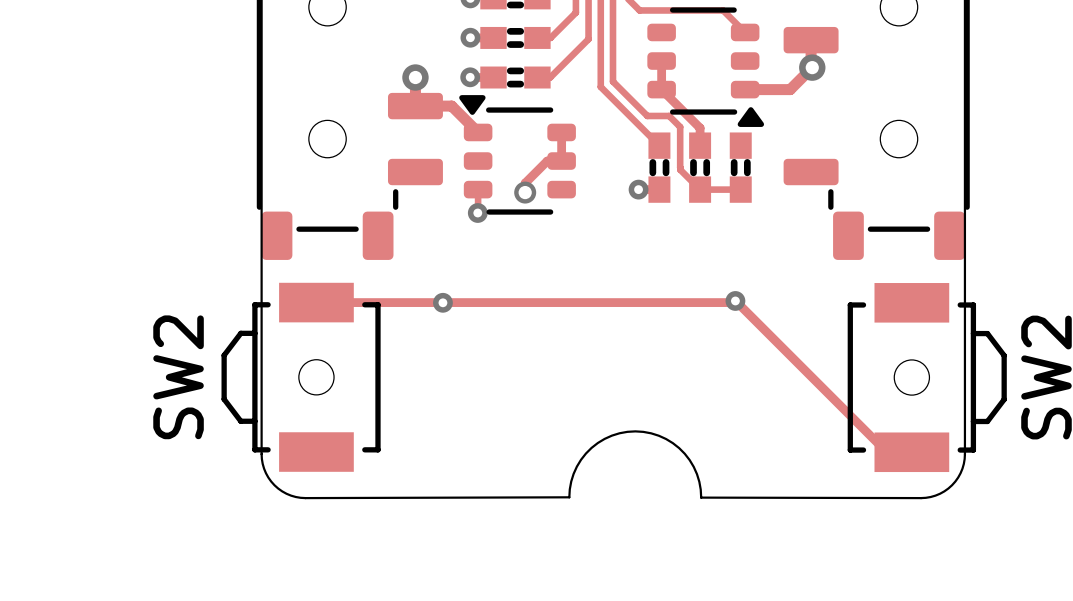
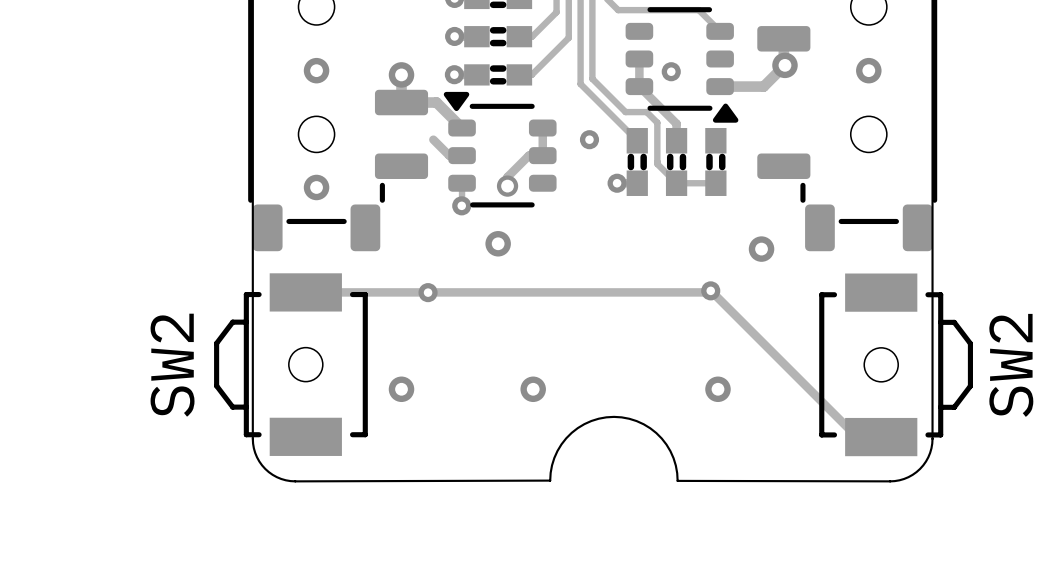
via: none -> (316, 70)
via: none -> (868, 70)
via: none -> (671, 71)
track: none -> (433, 139) (449, 155) (462, 155)
via: none -> (589, 139)
via: none -> (316, 187)
via: none -> (498, 243)
via: none -> (761, 249)
via: none -> (401, 389)
via: none -> (533, 389)
via: none -> (717, 389)

